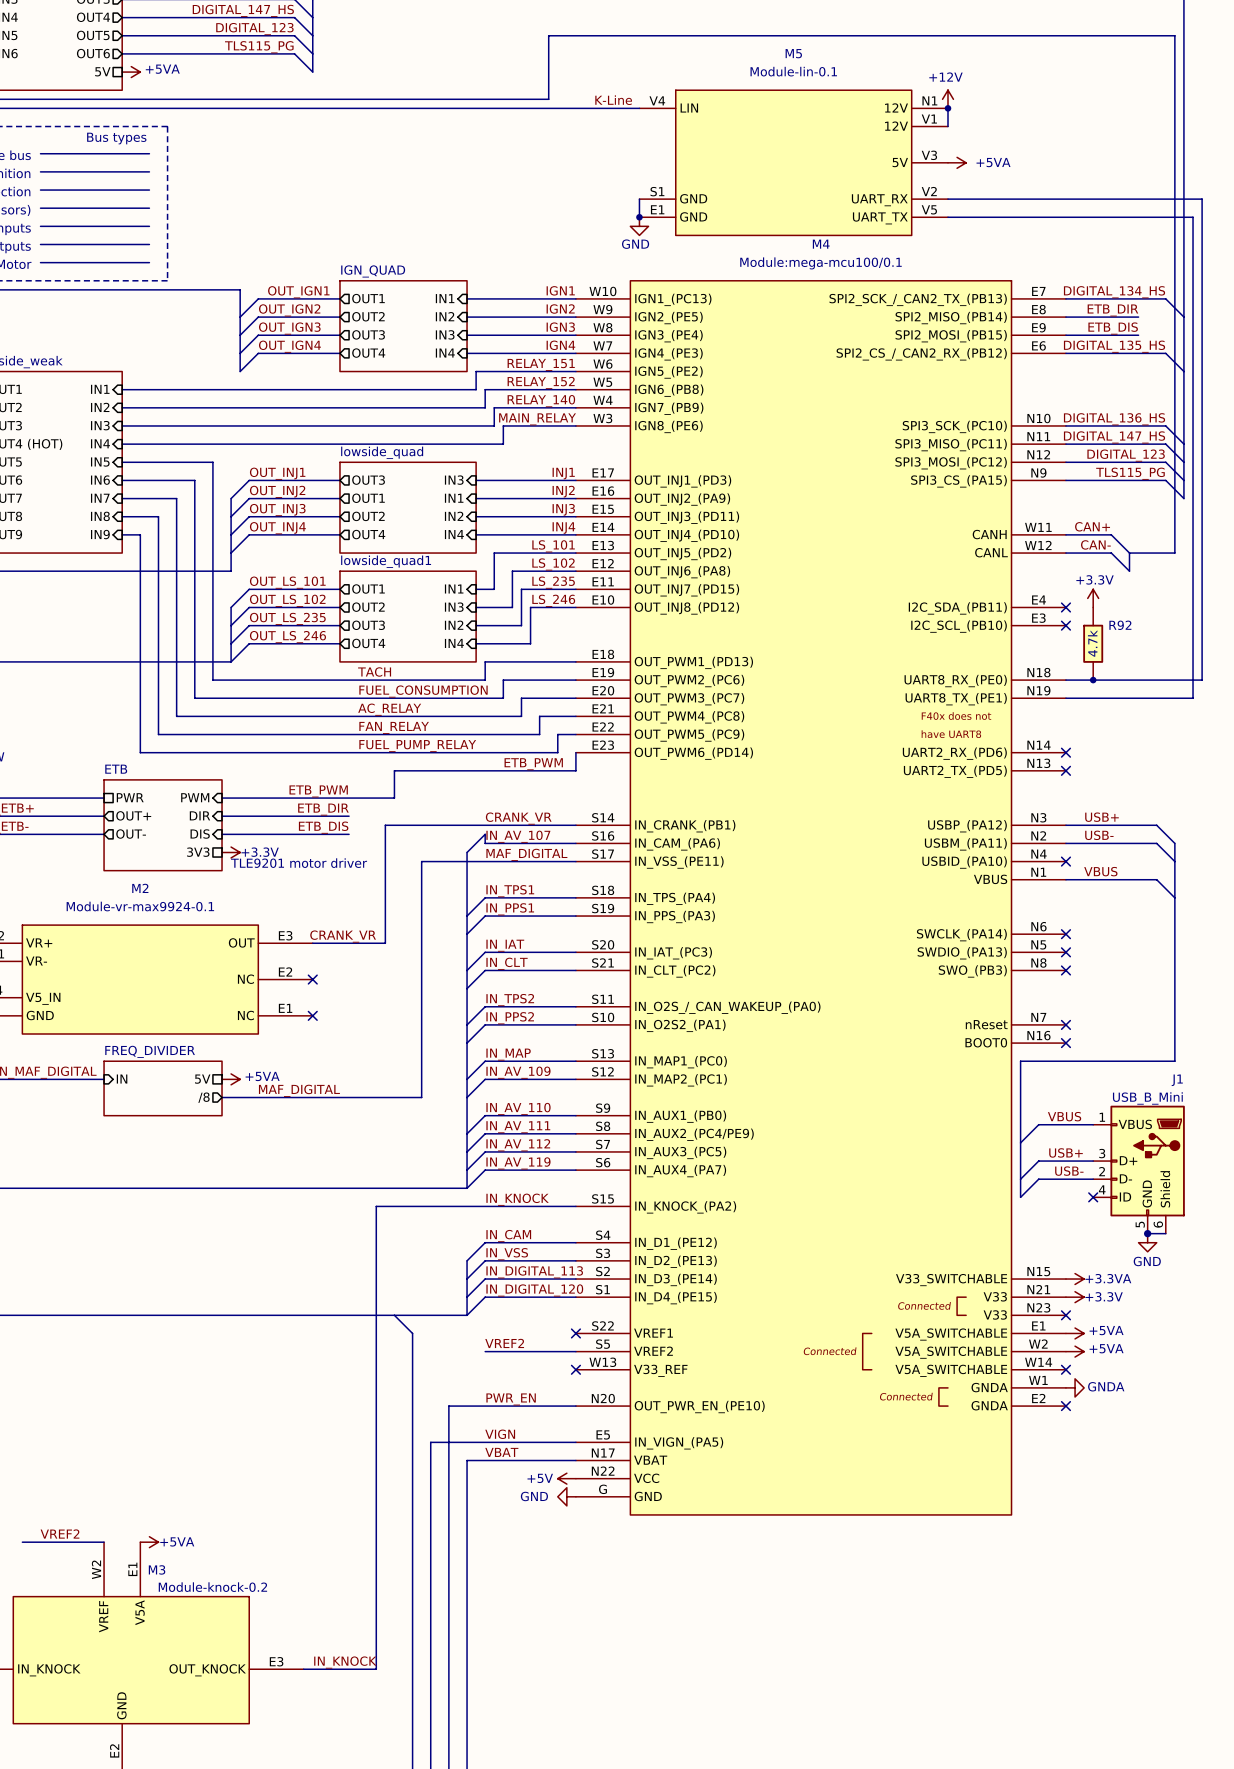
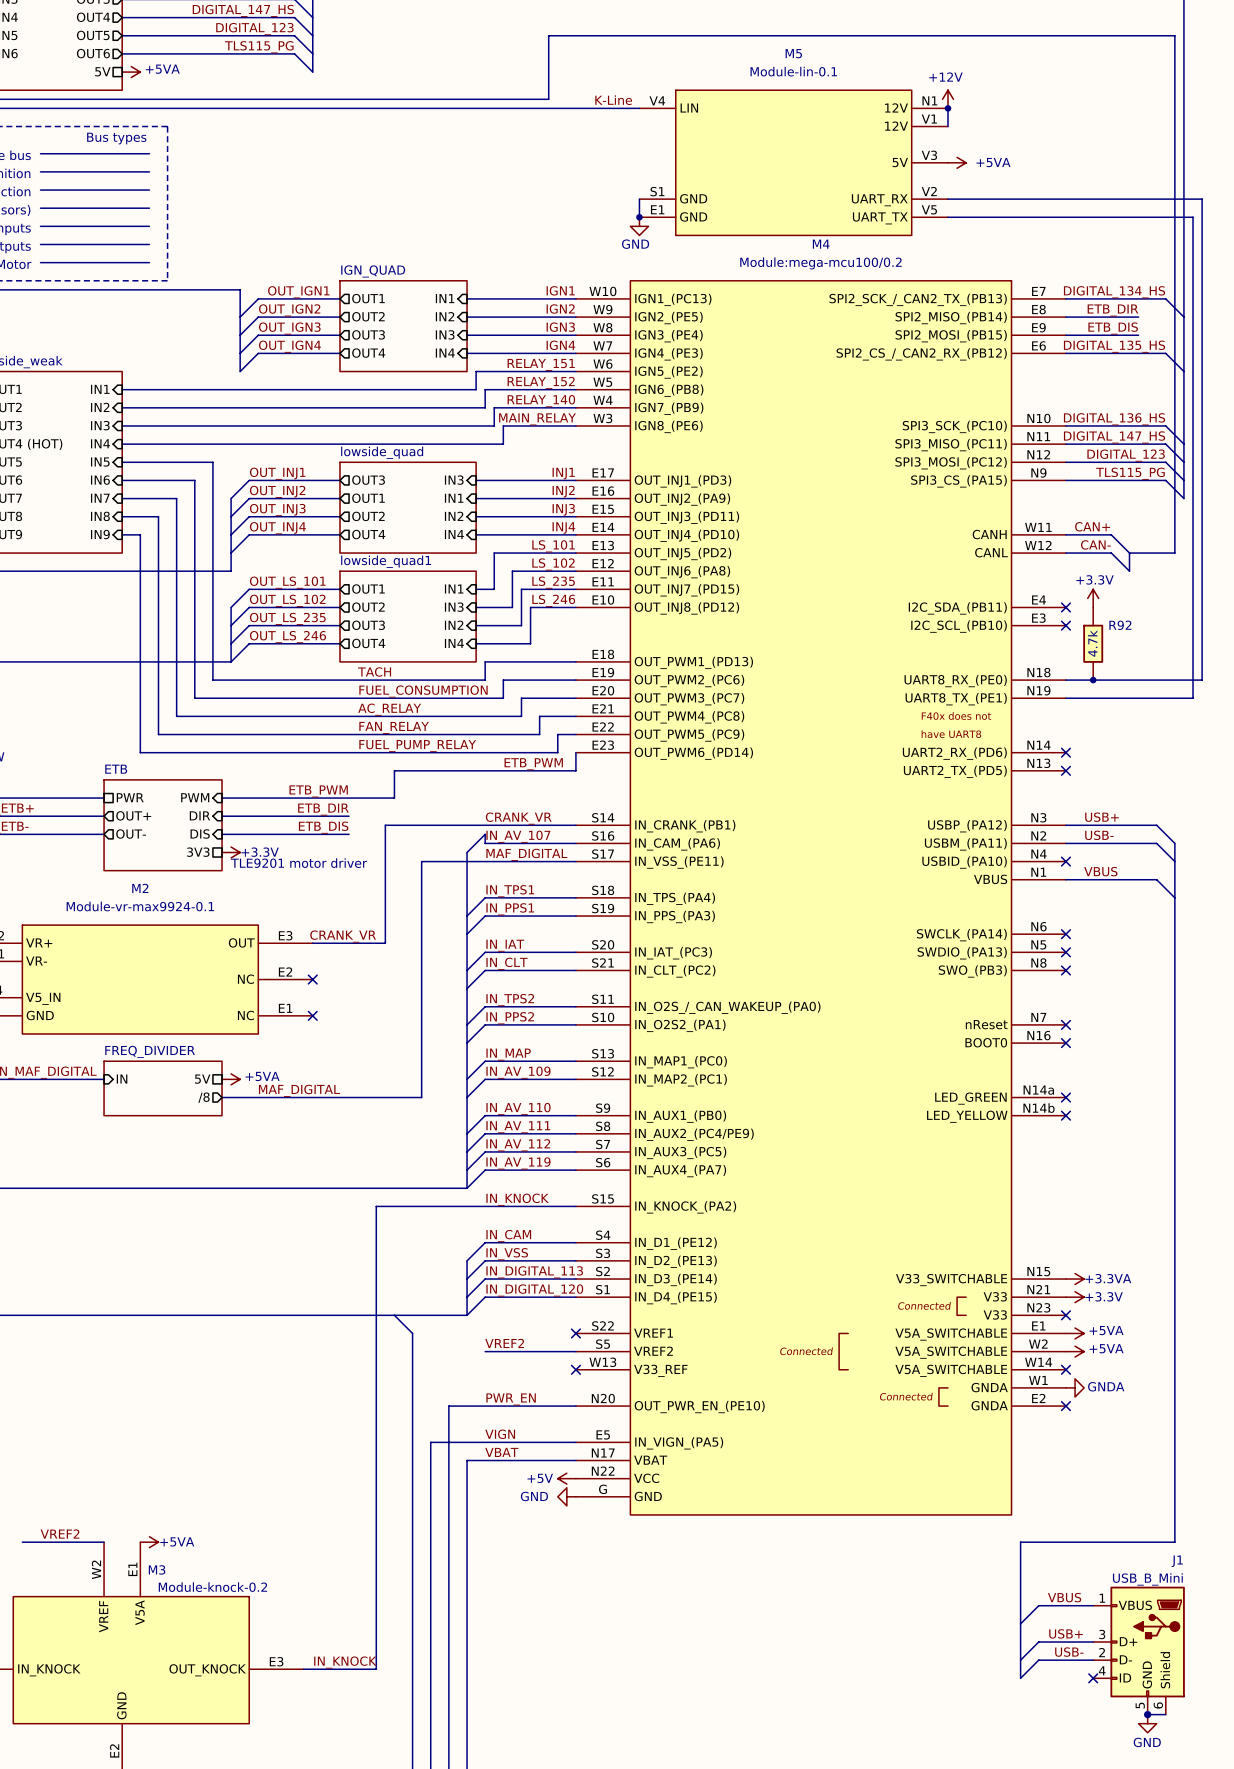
M4 value: Module:mega-mcu100/0.1 (820, 263) -> Module:mega-mcu100/0.2 (820, 263)
M4 symbol: [575, 280, 1066, 1515] -> [575, 280, 1066, 1515]
bus: (1174, 1061) (1020, 1061) (1020, 1197) -> (1174, 1061) (1174, 1542) (1020, 1542) (1020, 1678)
no-connect mark: none -> (1065, 1097)
no-connect mark: none -> (1065, 1115)
label: VBUS (1064, 1116) -> none
wire: (1093, 1124) (1038, 1124) (1020, 1142) -> none
label: USB+ (1066, 1152) -> none
wire: (1093, 1161) (1038, 1161) (1020, 1179) -> none
J1 position: (1139, 1169) -> (1139, 1650)
label: USB- (1069, 1171) -> none
wire: (1093, 1179) (1038, 1179) (1020, 1197) -> none
no-connect mark: (1093, 1197) -> none
wire: (1147, 1233) (1165, 1233) -> none
junction: (1147, 1233) -> none
power symbol: GND (1147, 1242) -> none
label: none -> VBUS (1064, 1597)
wire: none -> (1093, 1605) (1038, 1605) (1020, 1623)
label: none -> USB+ (1066, 1633)
wire: none -> (1093, 1642) (1038, 1642) (1020, 1660)
label: none -> USB- (1069, 1652)
wire: none -> (1093, 1660) (1038, 1660) (1020, 1678)
no-connect mark: none -> (1093, 1678)
wire: none -> (1147, 1714) (1165, 1714)
junction: none -> (1147, 1714)
power symbol: none -> GND (1147, 1723)

